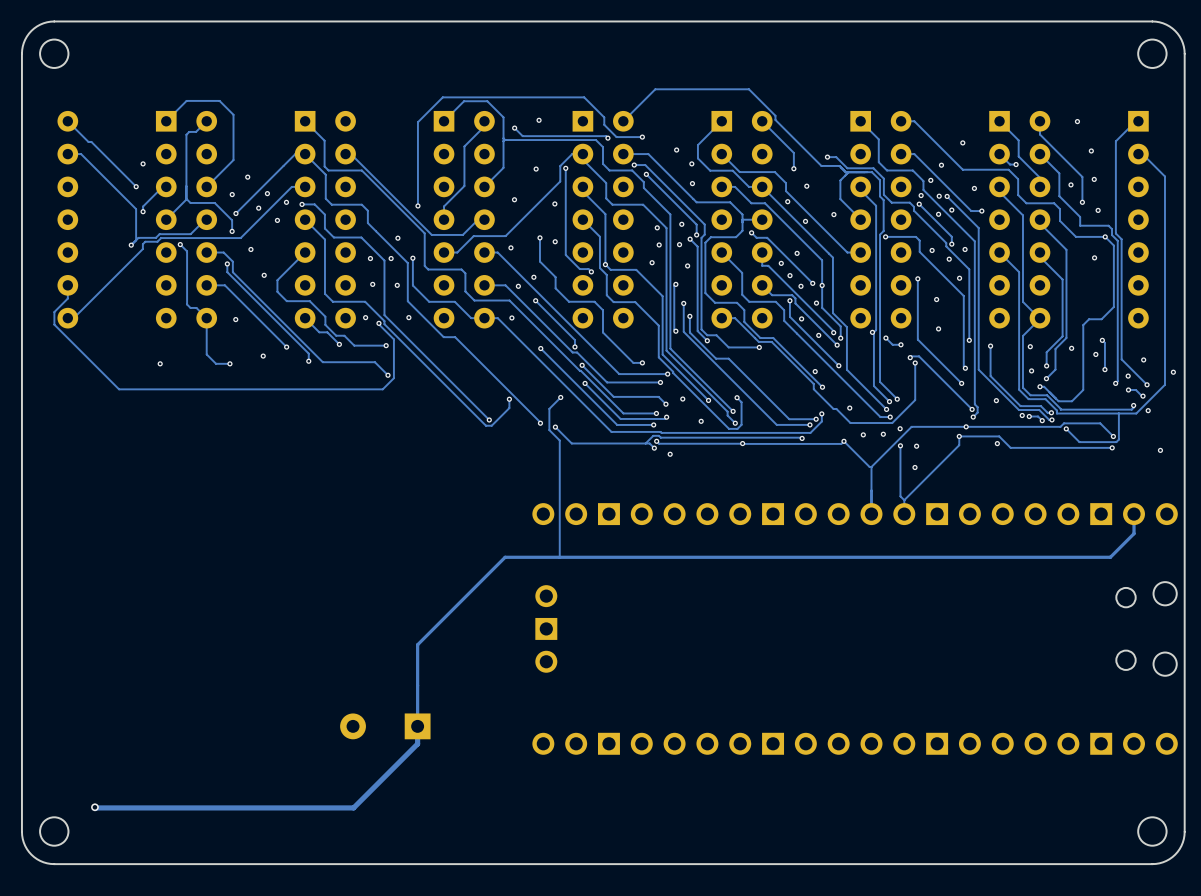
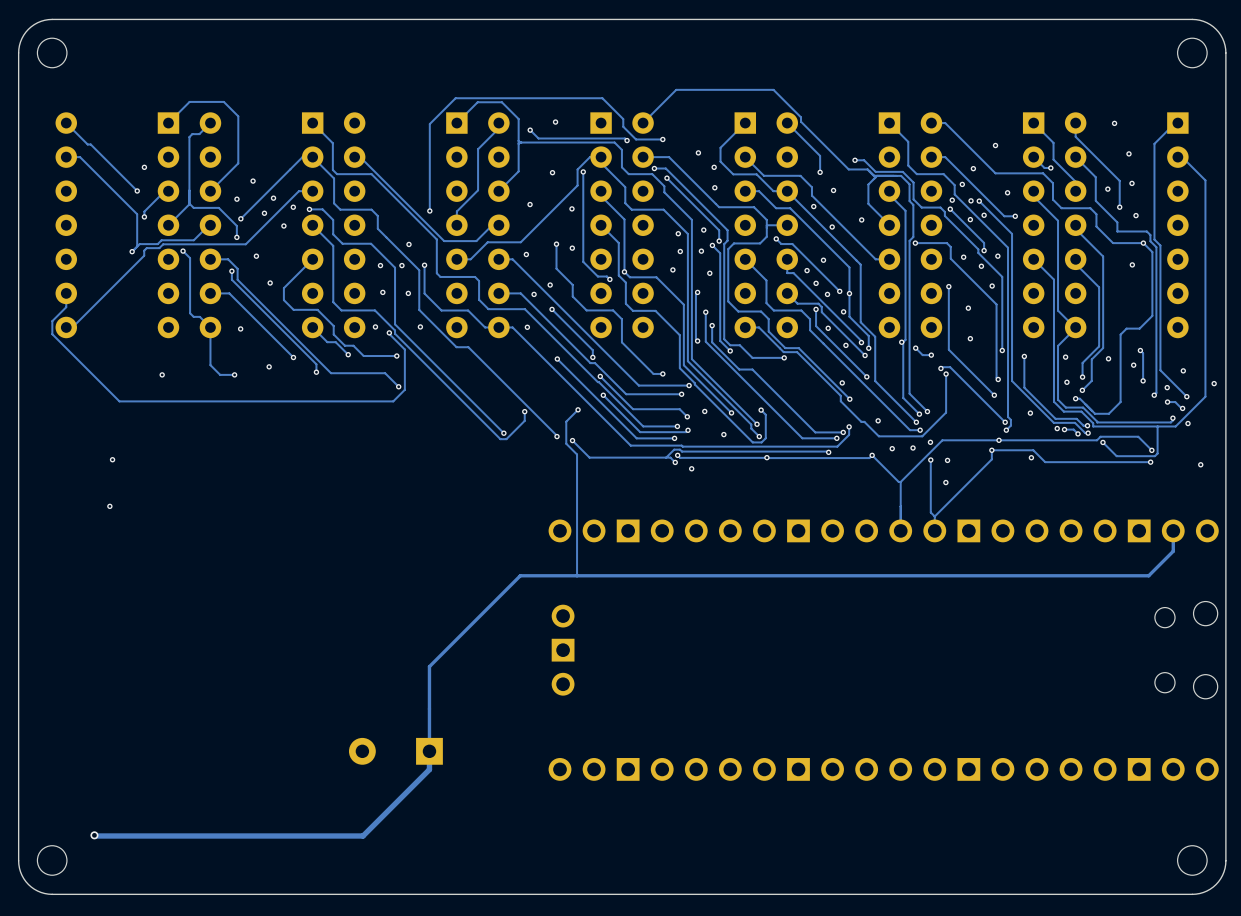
via: none -> (112, 459)
via: none -> (109, 506)

